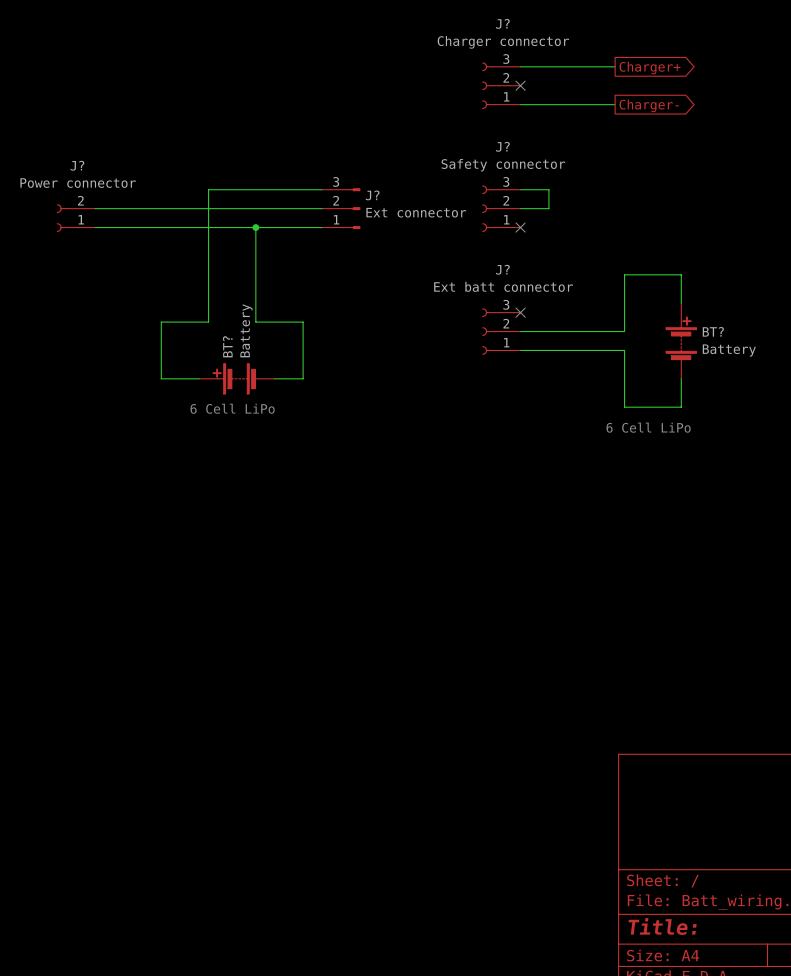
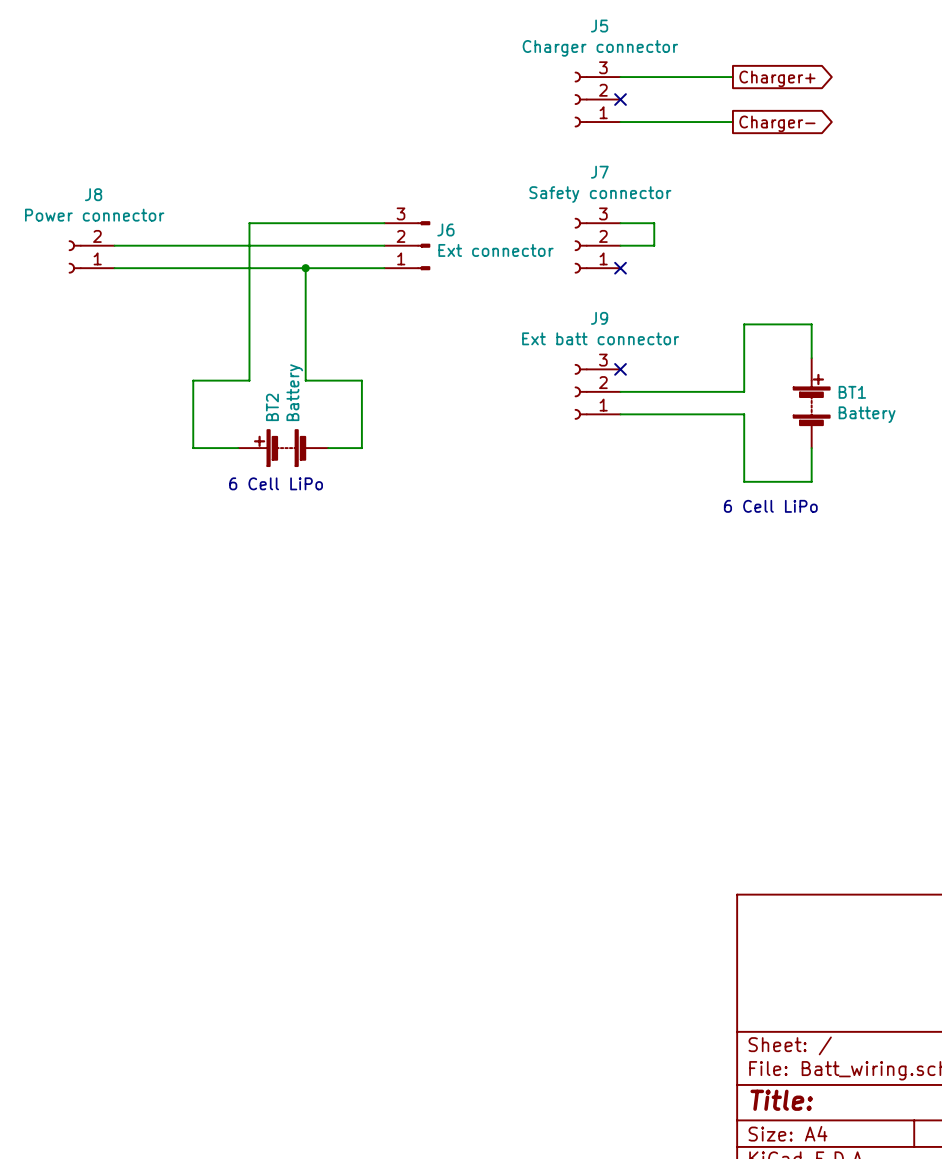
J? name: J? (502, 23) -> J5 (599, 26)
J? name: J? (502, 146) -> J7 (599, 172)
J? name: J? (77, 165) -> J8 (93, 194)
J? name: J? (372, 195) -> J6 (445, 229)
J? name: J? (502, 269) -> J9 (599, 318)
BT? name: BT? (713, 331) -> BT1 (852, 392)
BT? name: BT? (227, 346) -> BT2 (272, 407)

